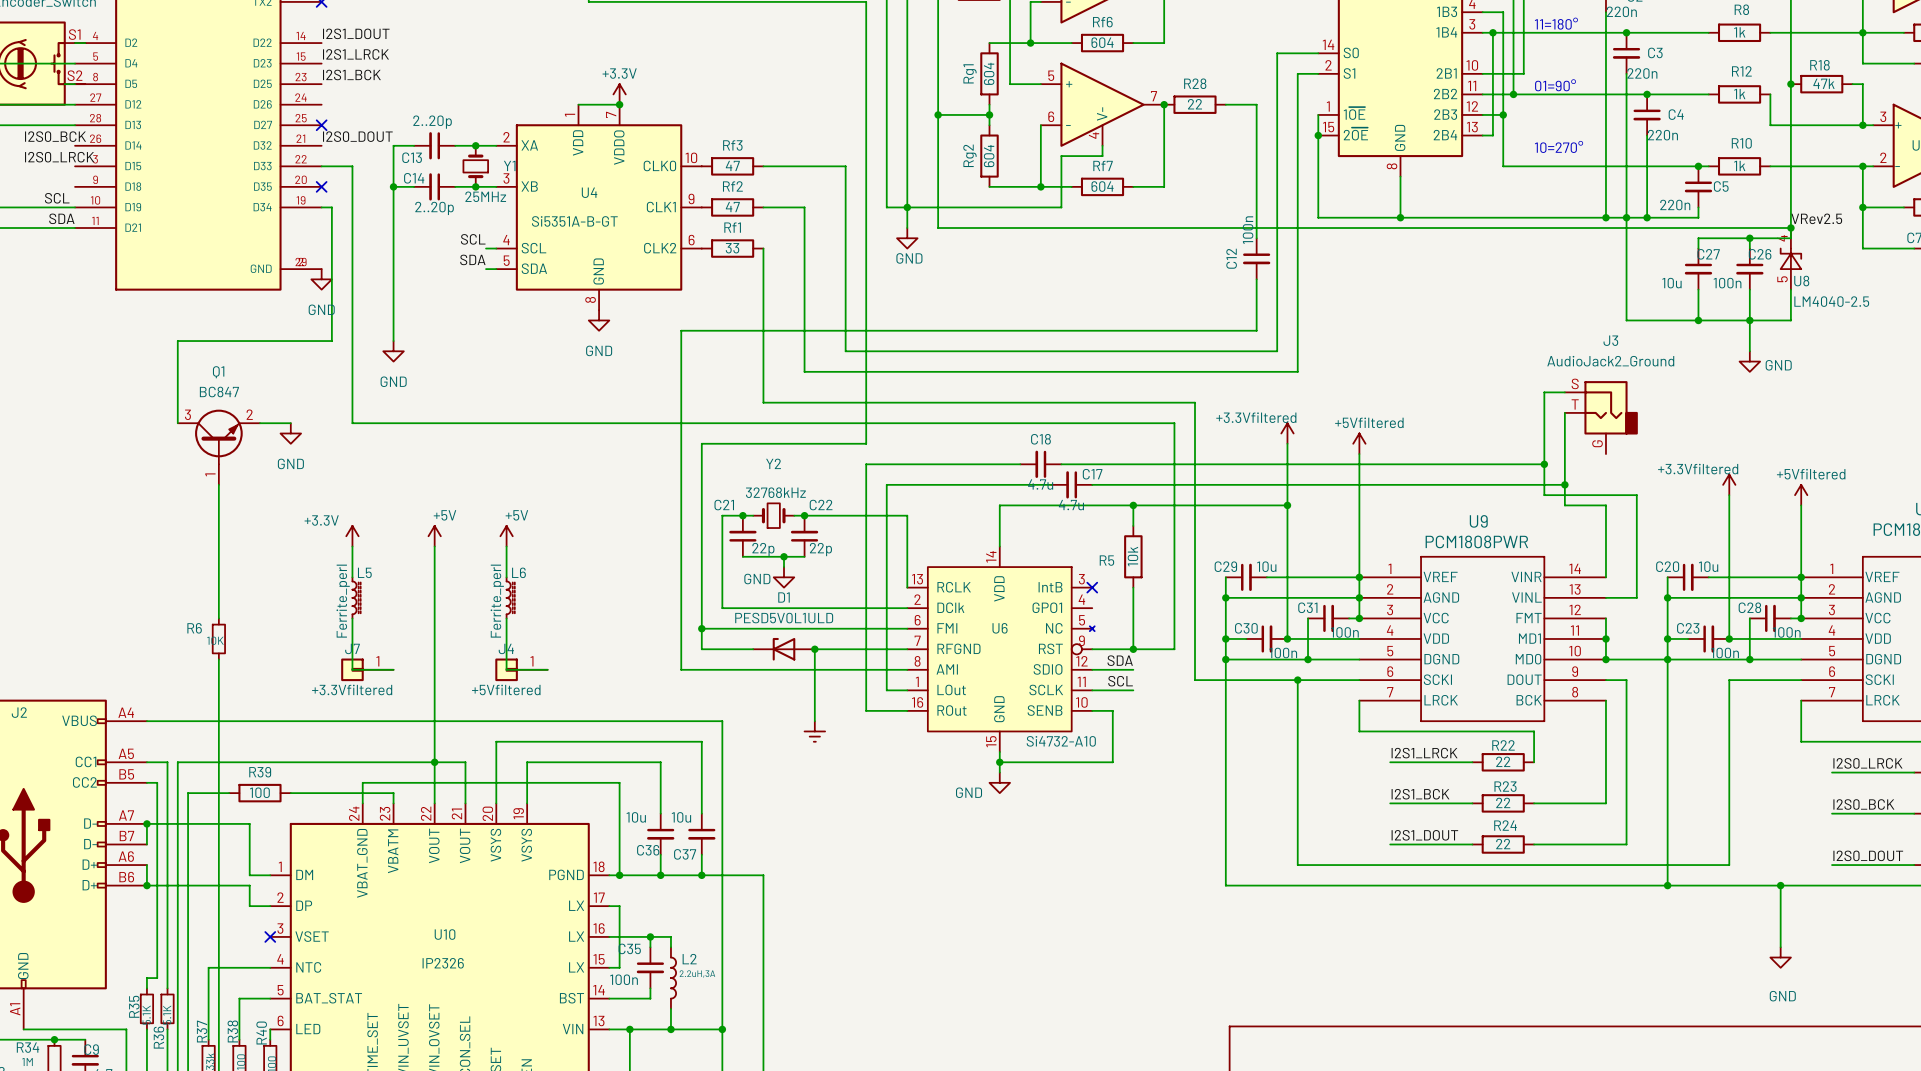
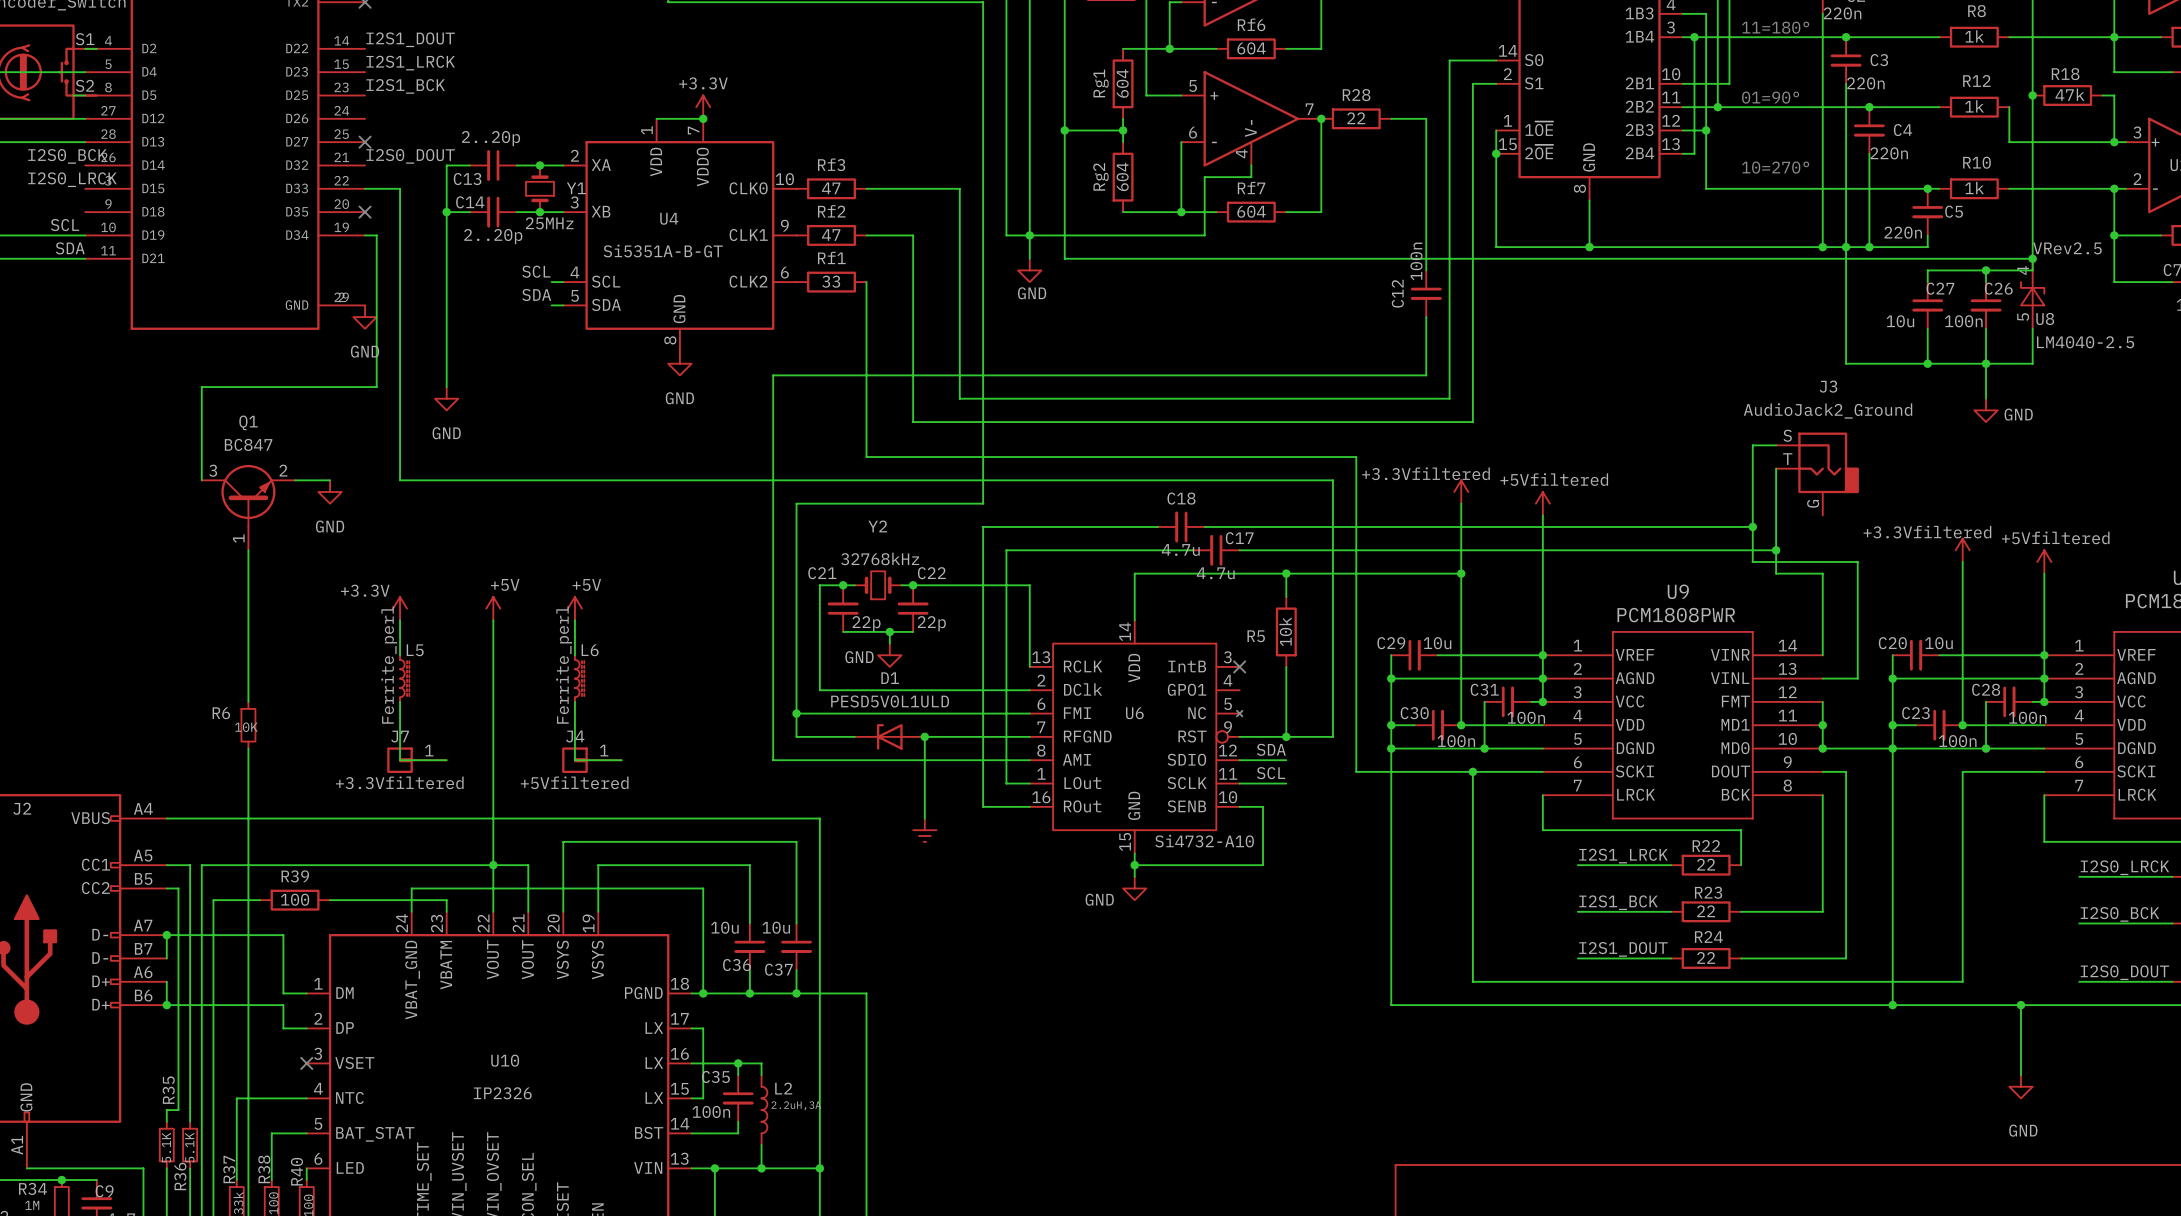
R35 name position: R35 (134, 1006) -> R35 (168, 1090)

